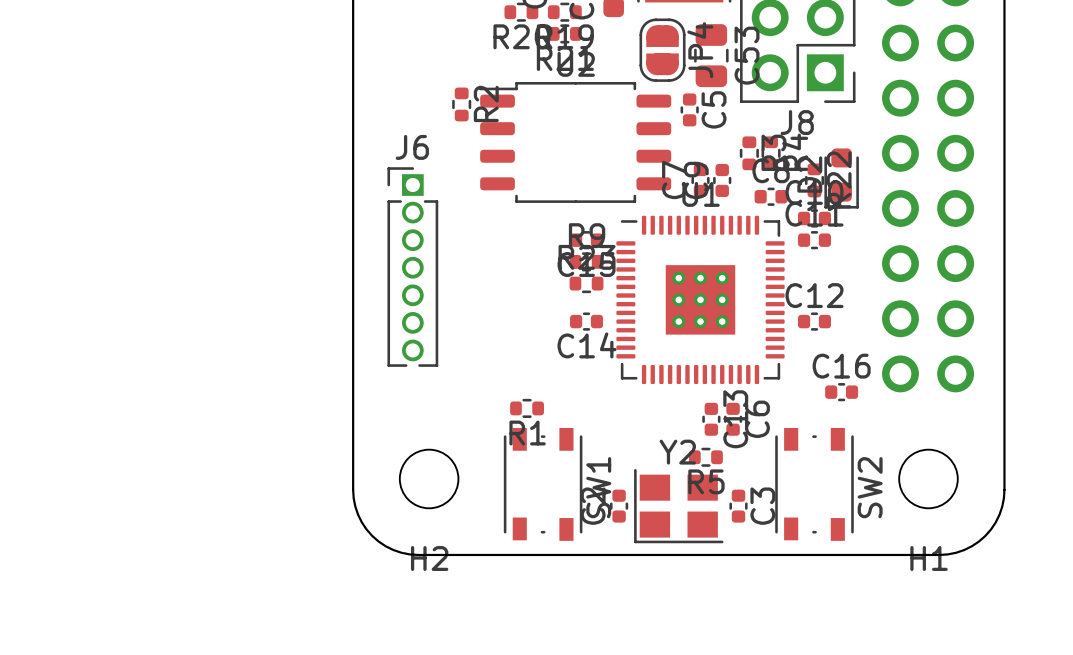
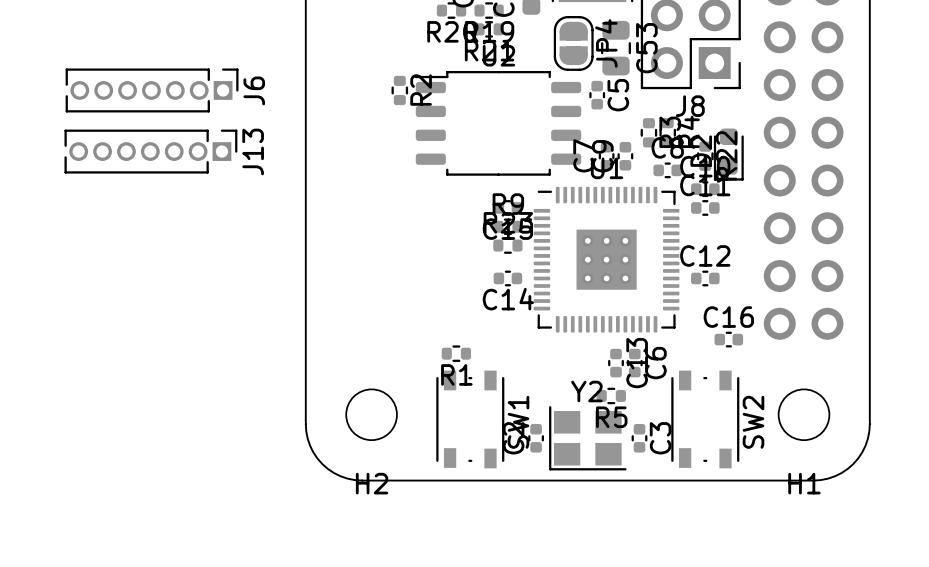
J13: none -> (150, 151)
J6 rotation: 0° (412, 267) -> 90° clockwise (152, 90)
J6 position: (412, 267) -> (152, 90)

